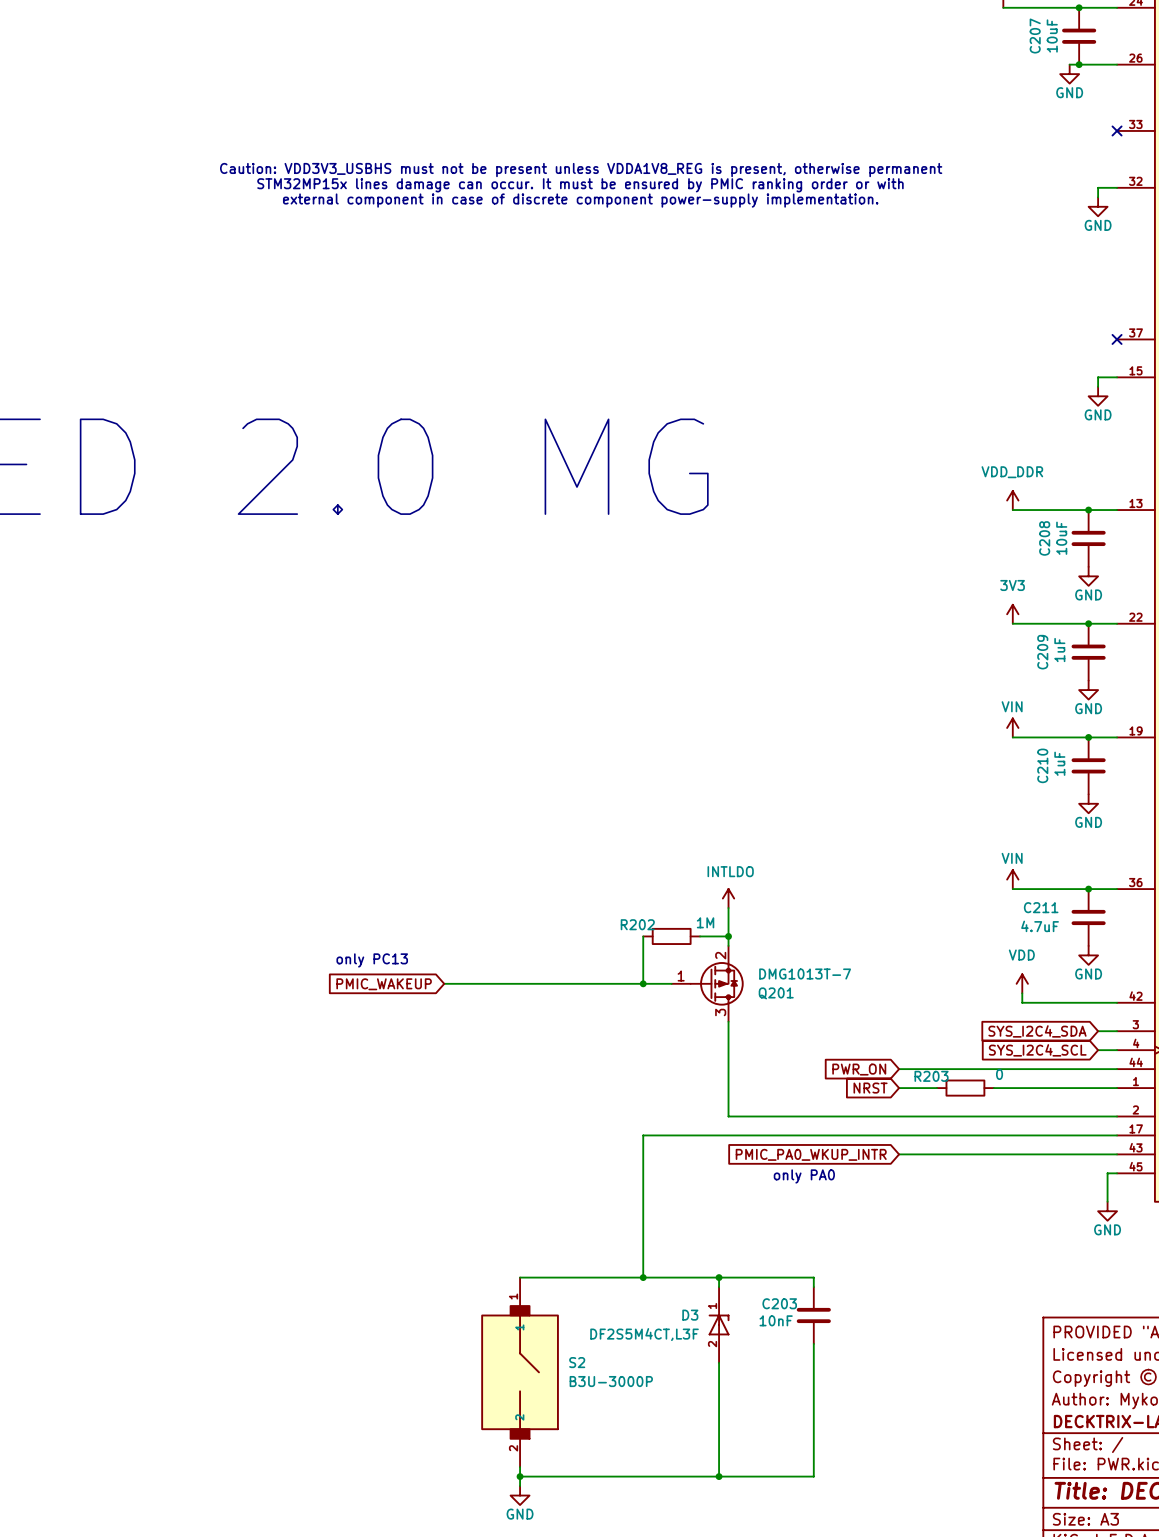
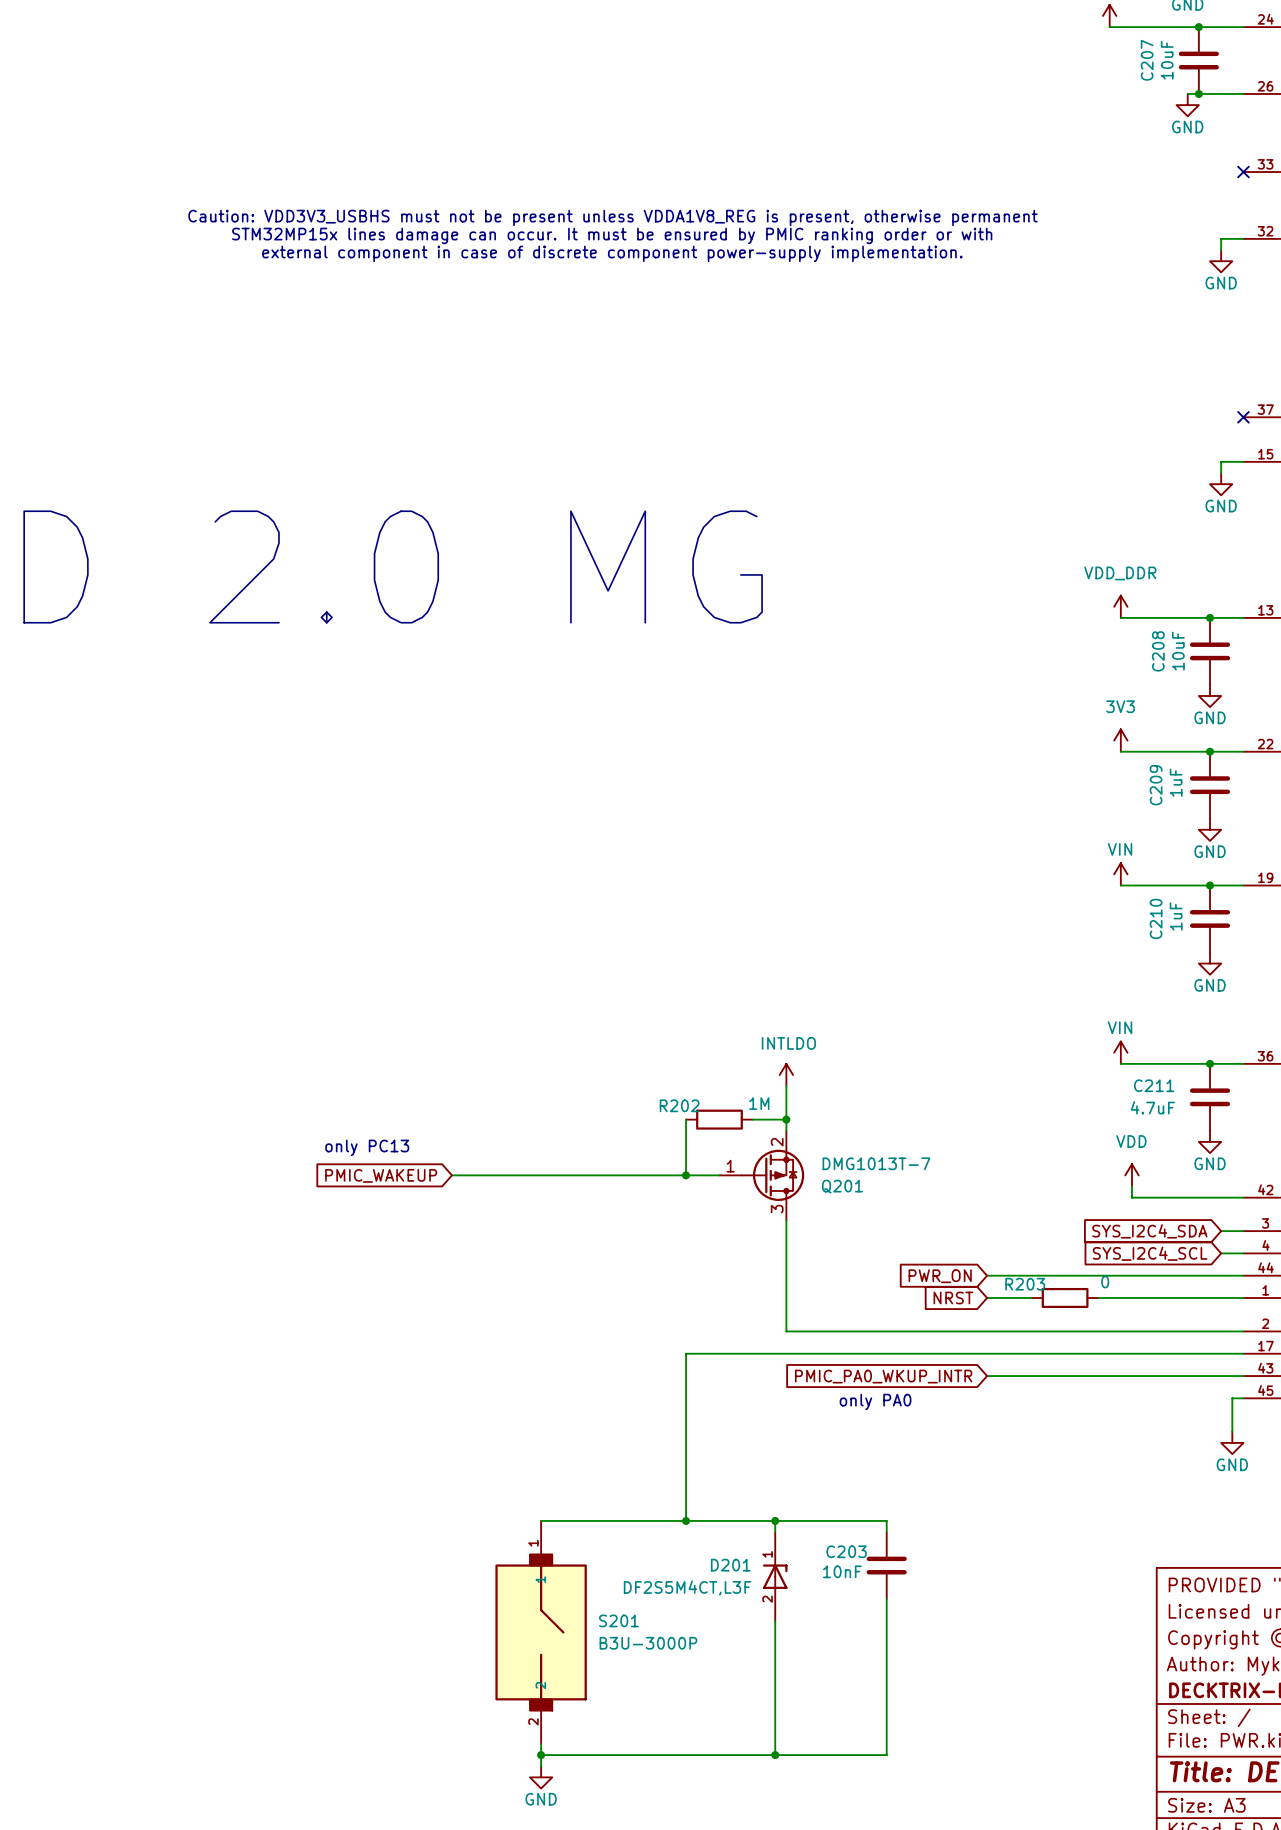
D3 name: D3 (690, 1315) -> D201 (730, 1565)
S2 name: S2 (577, 1362) -> S201 (618, 1620)

